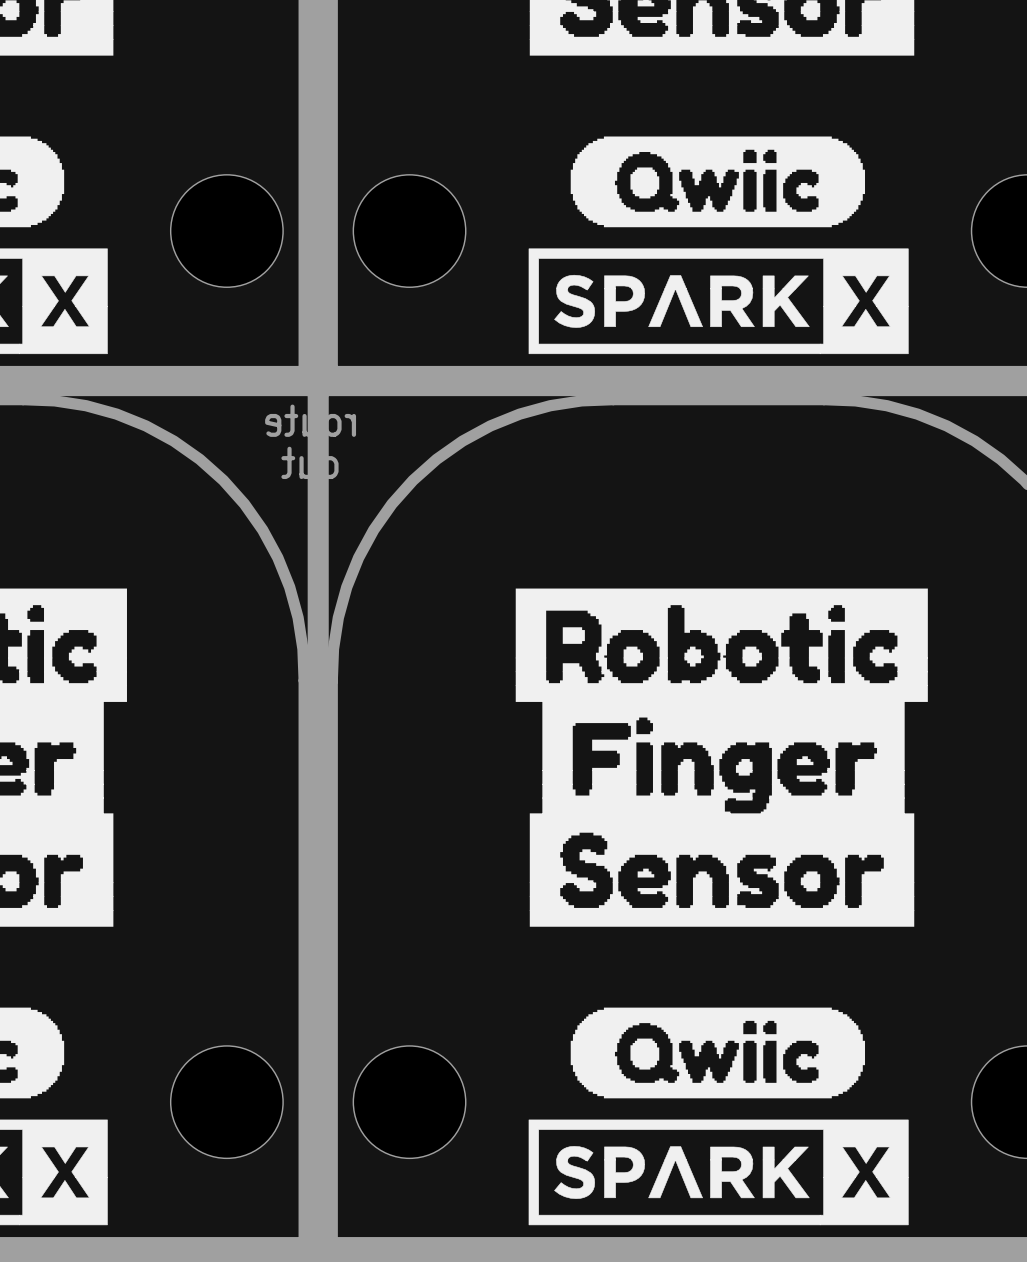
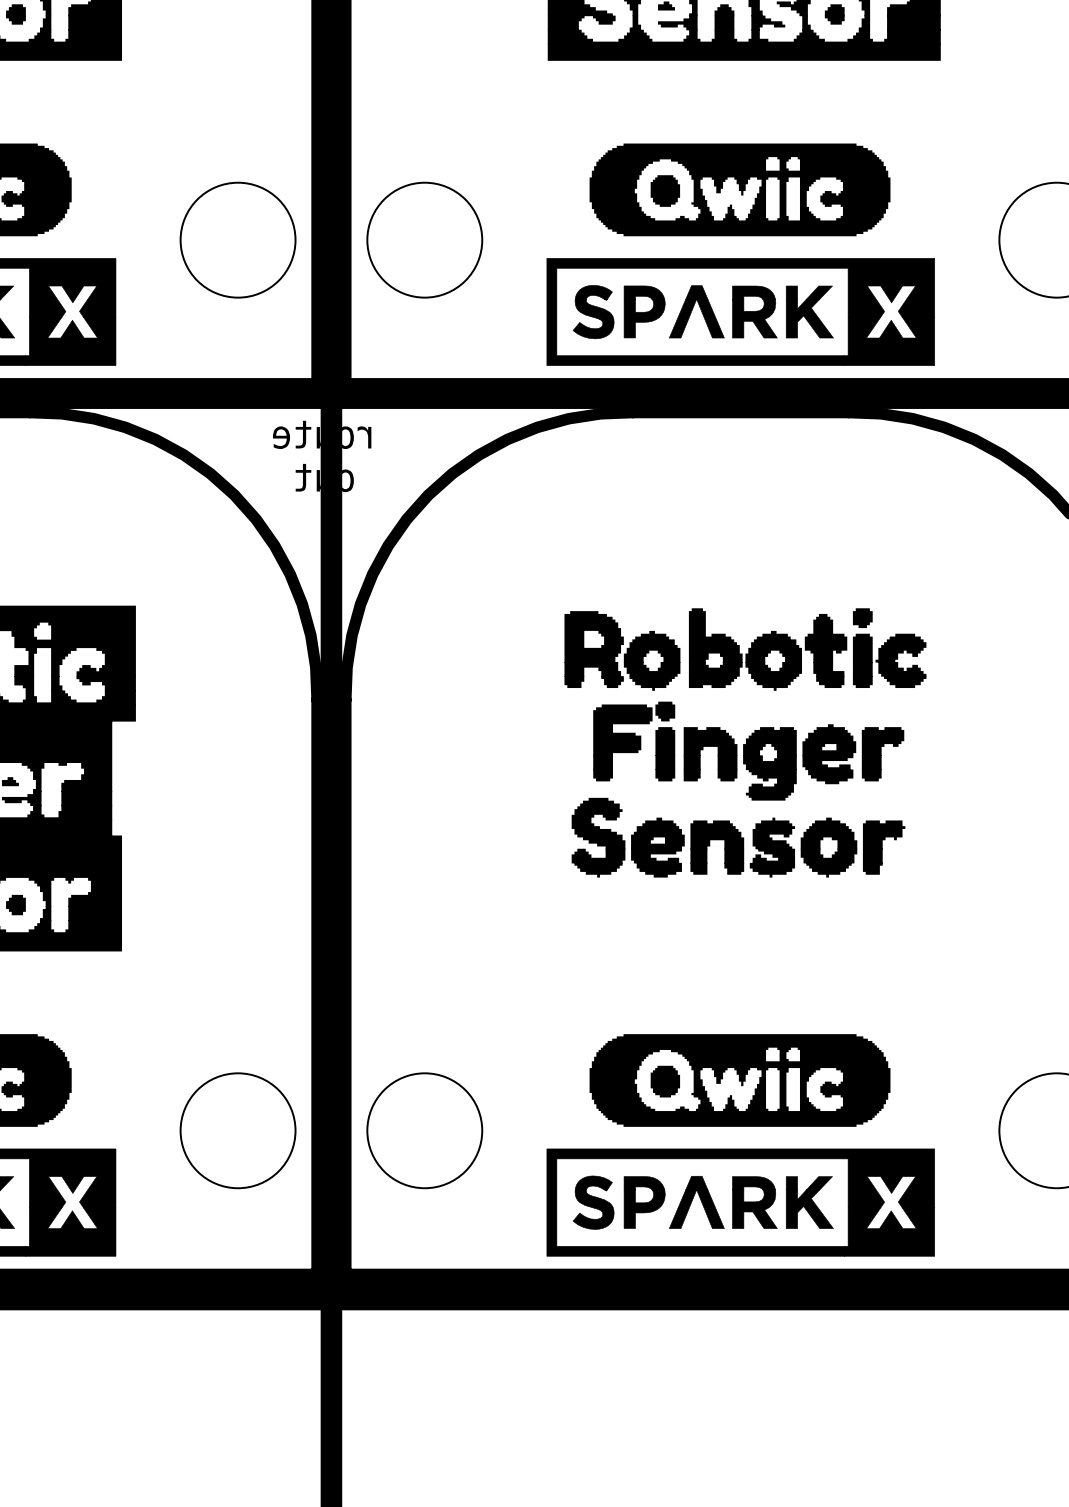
drawing shape: [515, 588, 928, 702] -> [564, 608, 927, 691]
drawing shape: [542, 700, 905, 815] -> [593, 701, 905, 801]
drawing: none -> [571, 797, 906, 878]
drawing: [529, 813, 915, 927] -> none

